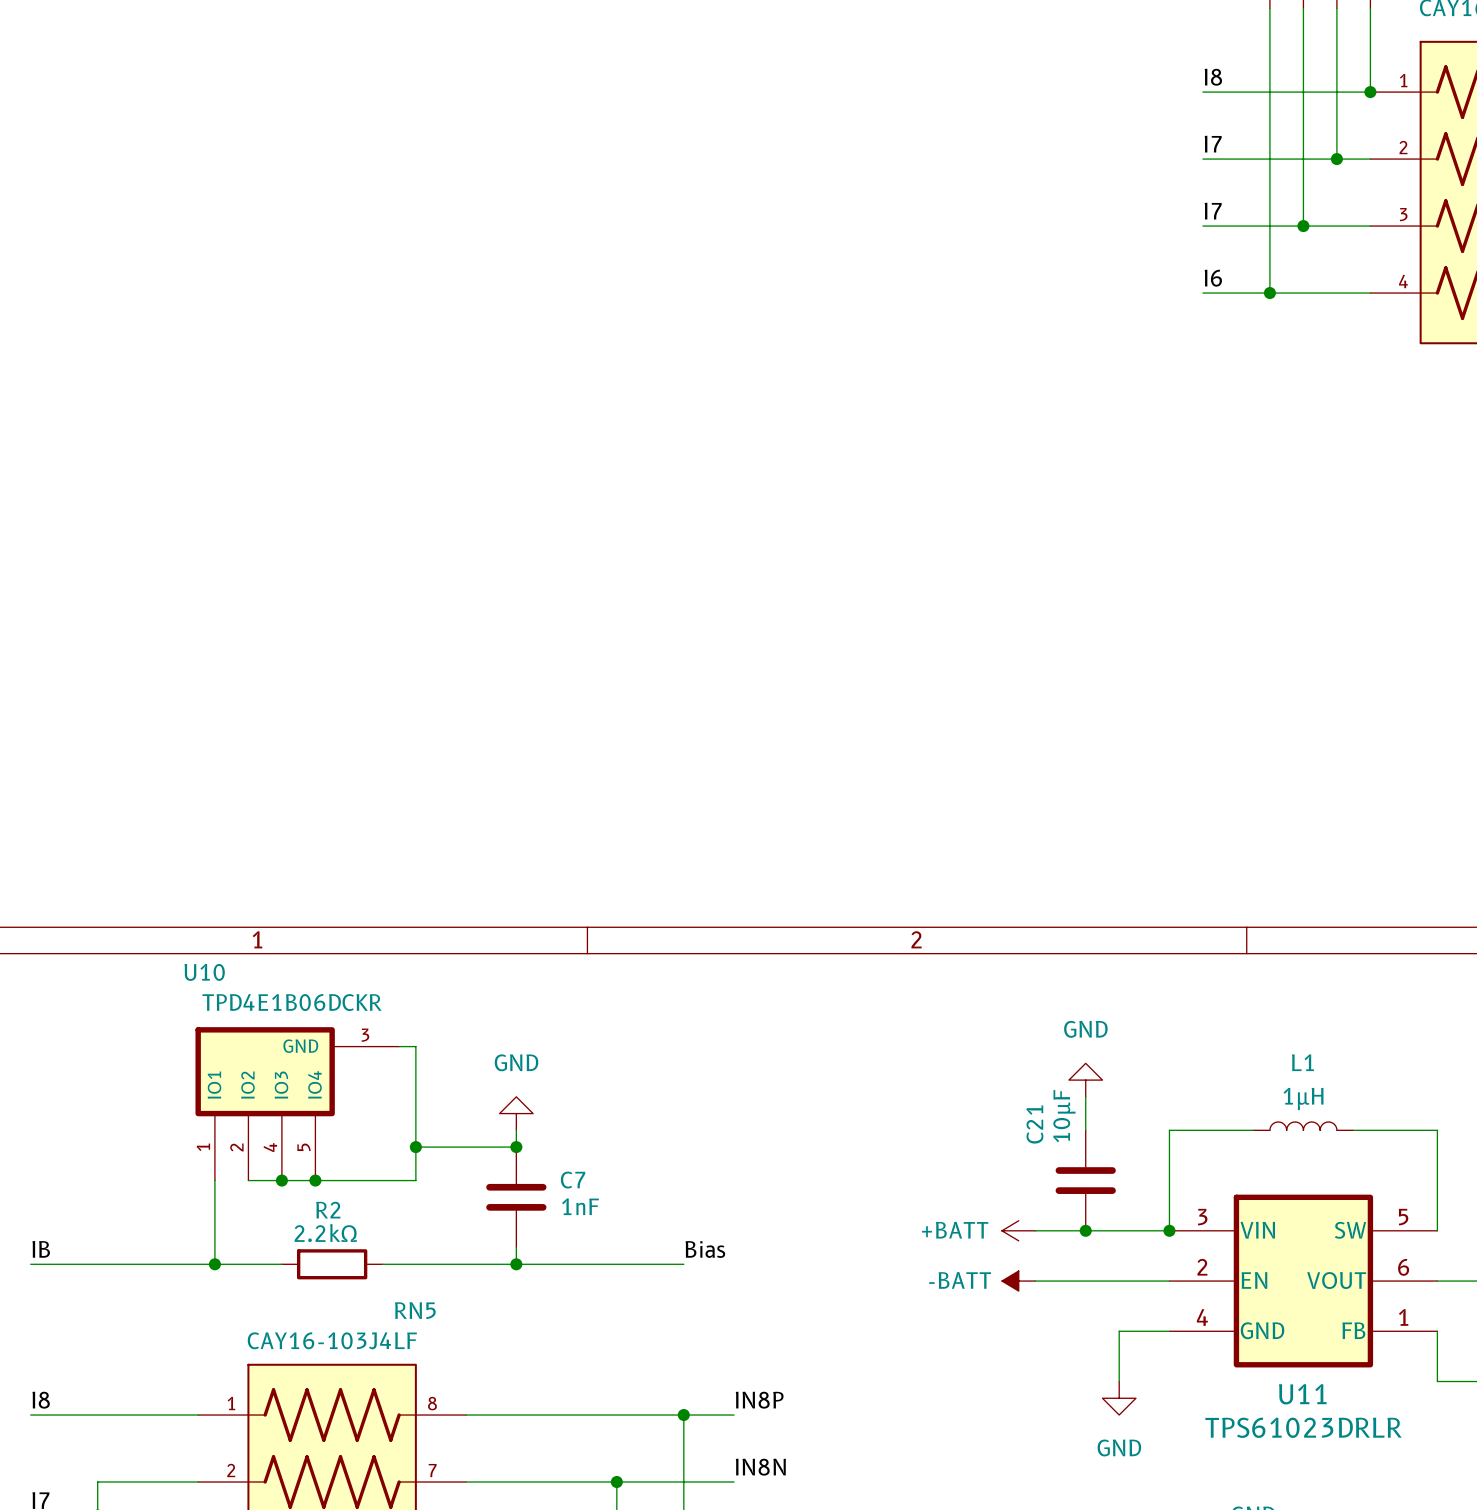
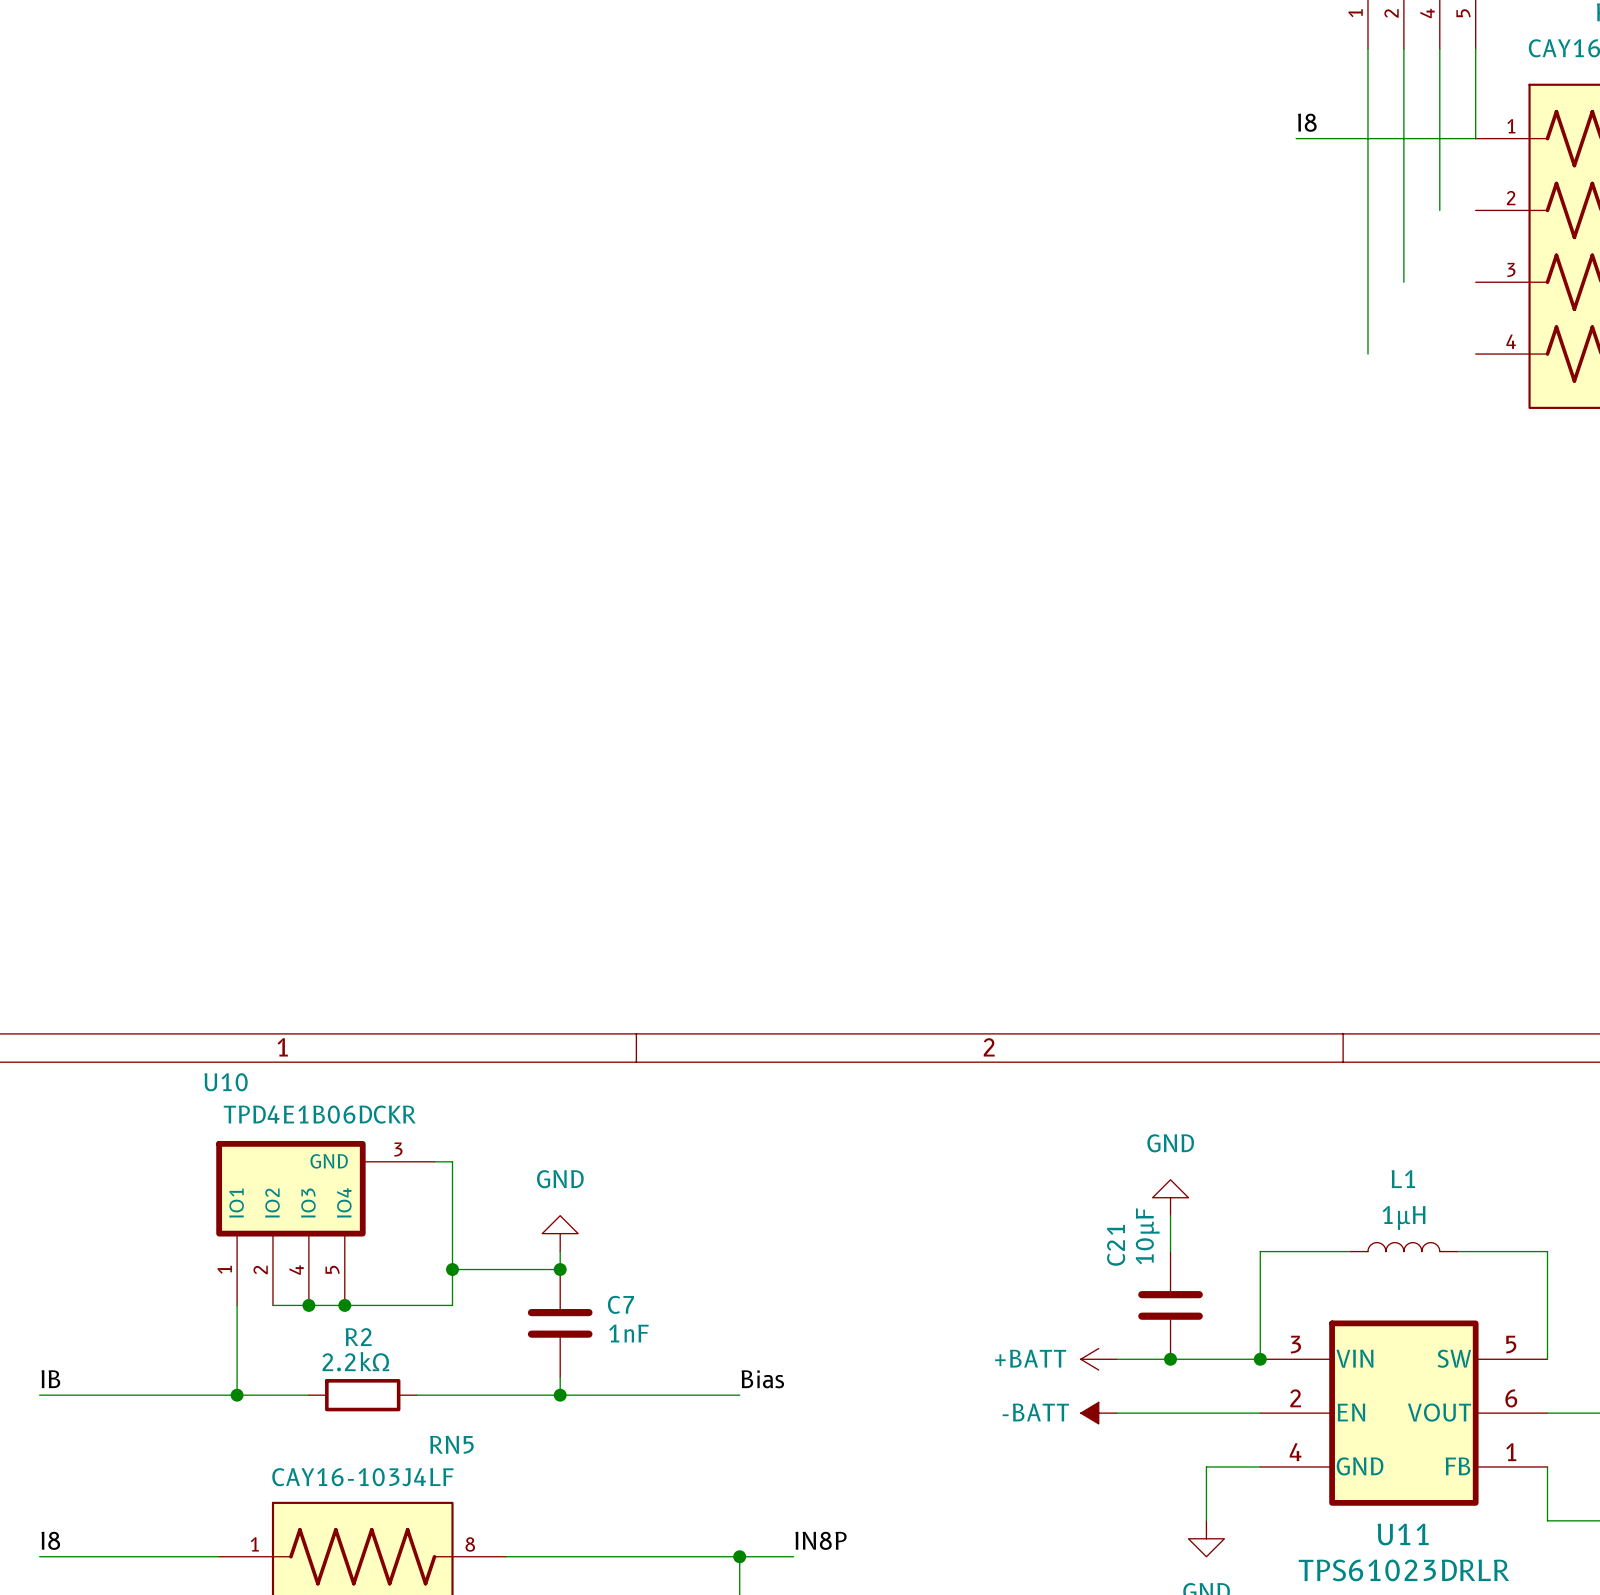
junction: (1370, 92) -> none
label: I7 (1213, 144) -> none
wire: (1202, 159) (1370, 159) -> none
junction: (1336, 159) -> none
label: I7 (1213, 211) -> none
wire: (1202, 226) (1370, 226) -> none
junction: (1303, 226) -> none
label: I6 (1213, 278) -> none
wire: (1202, 293) (1370, 293) -> none
junction: (1269, 293) -> none

